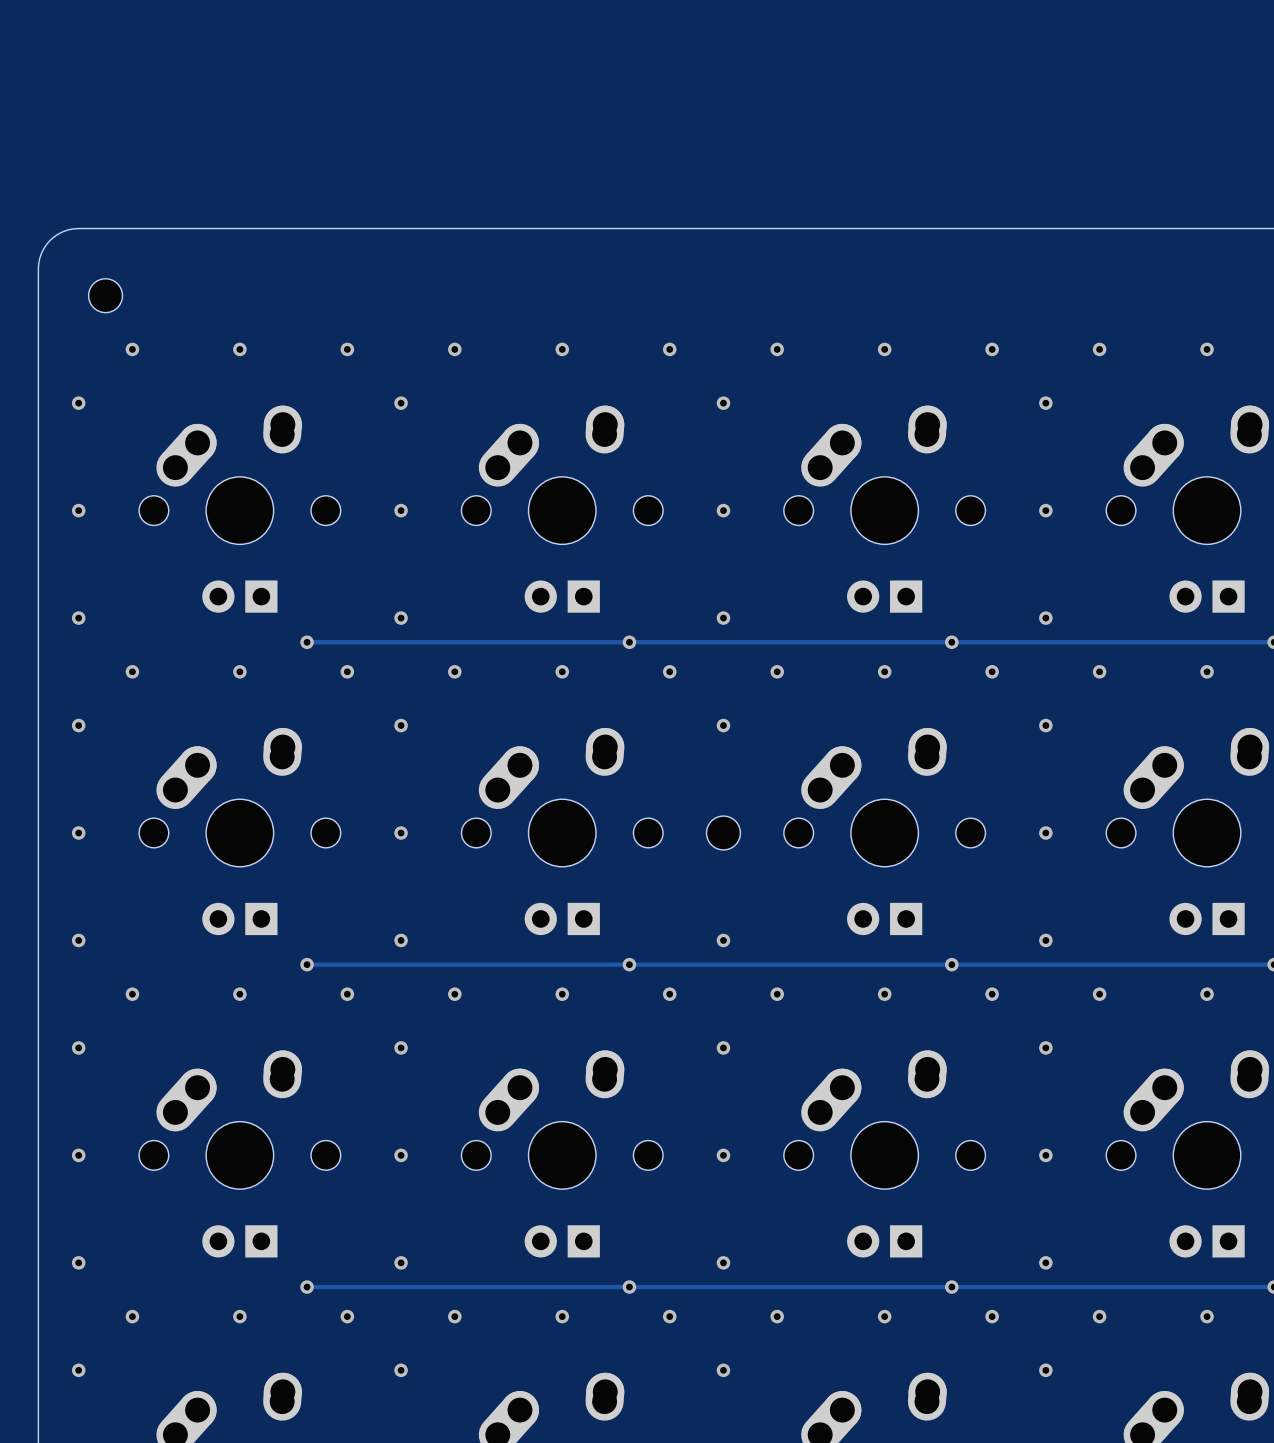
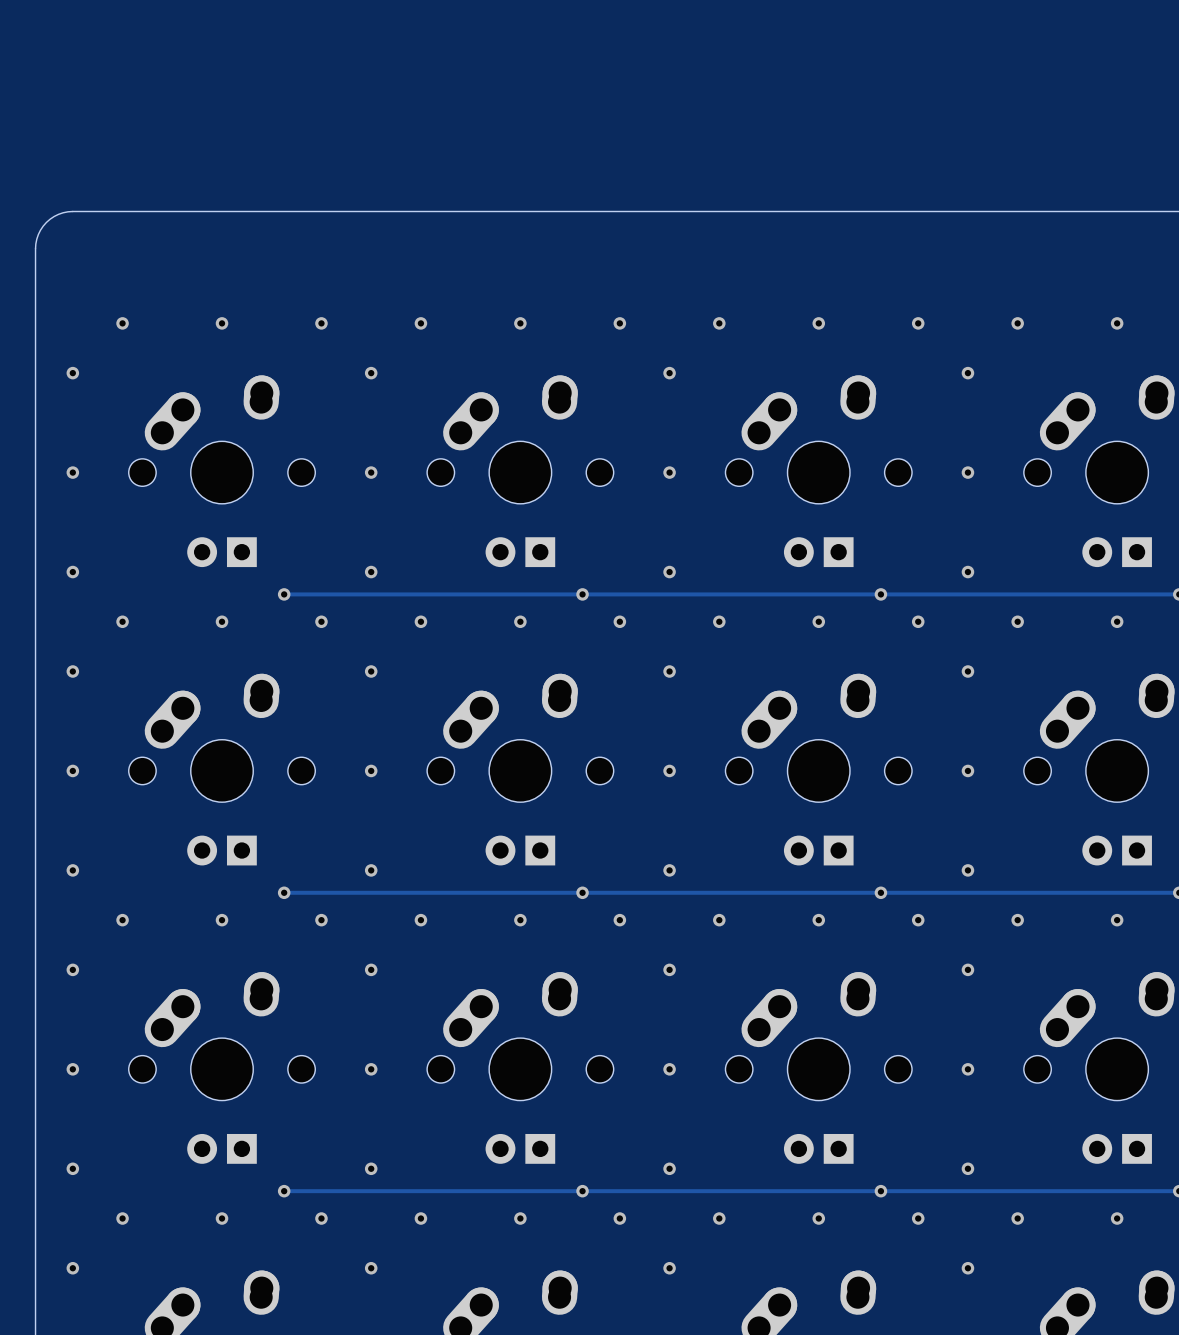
part: (105, 295) -> none
part: (723, 833) -> none
via: none -> (669, 770)

